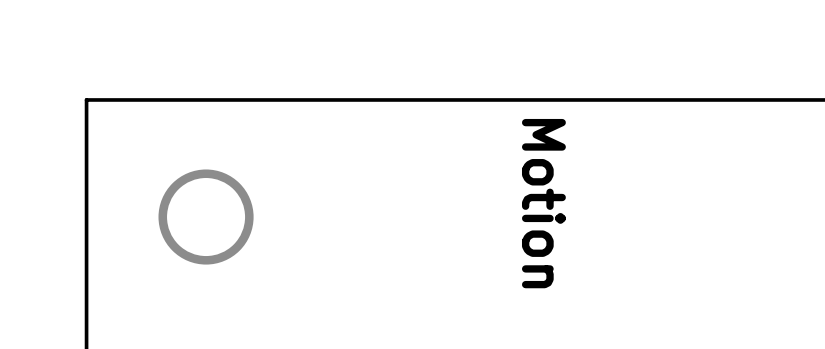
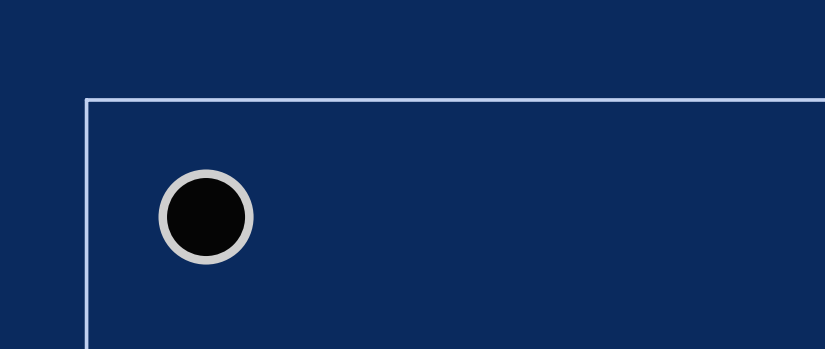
text: Motion (543, 203) -> none

